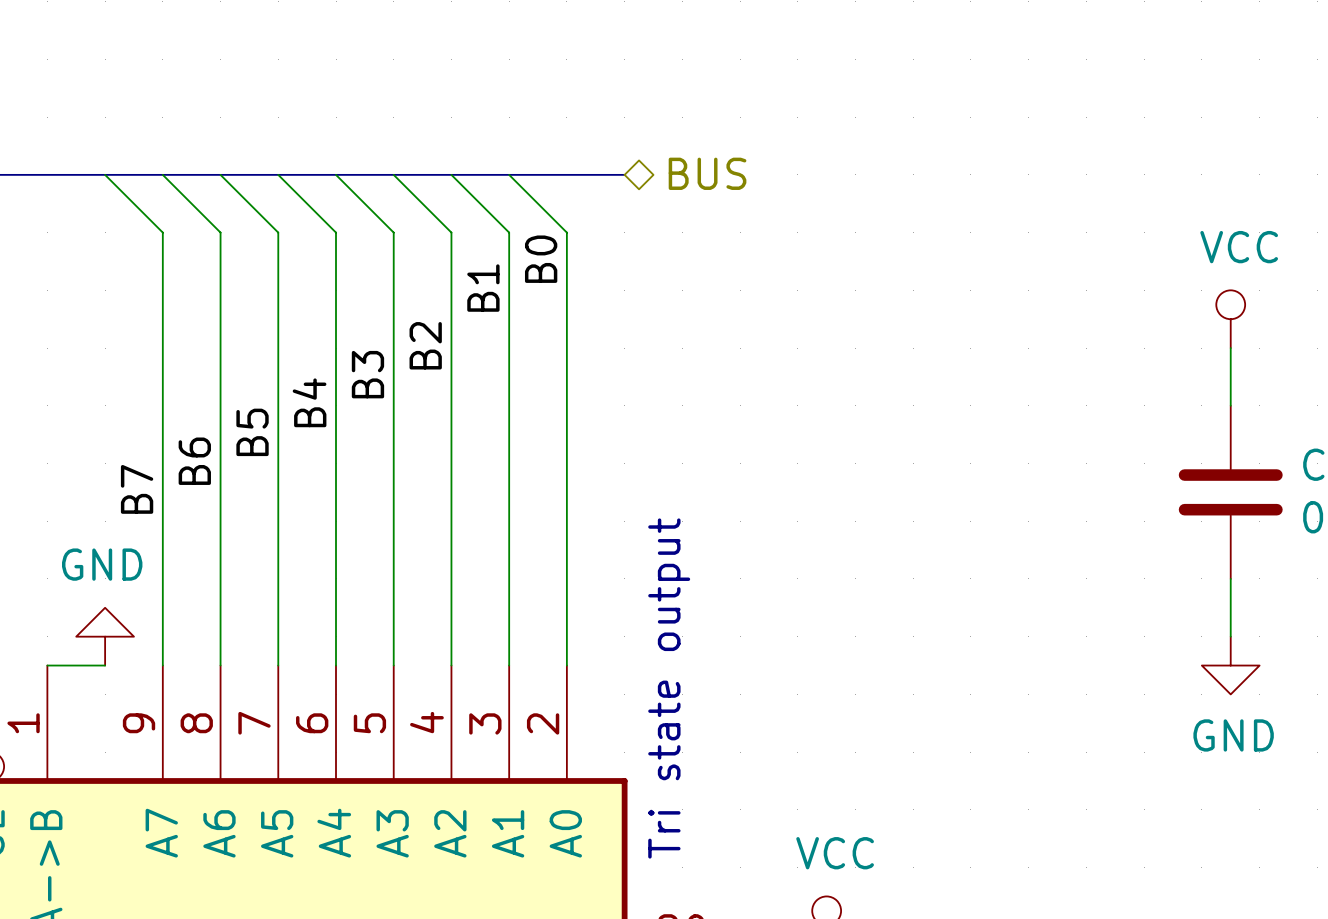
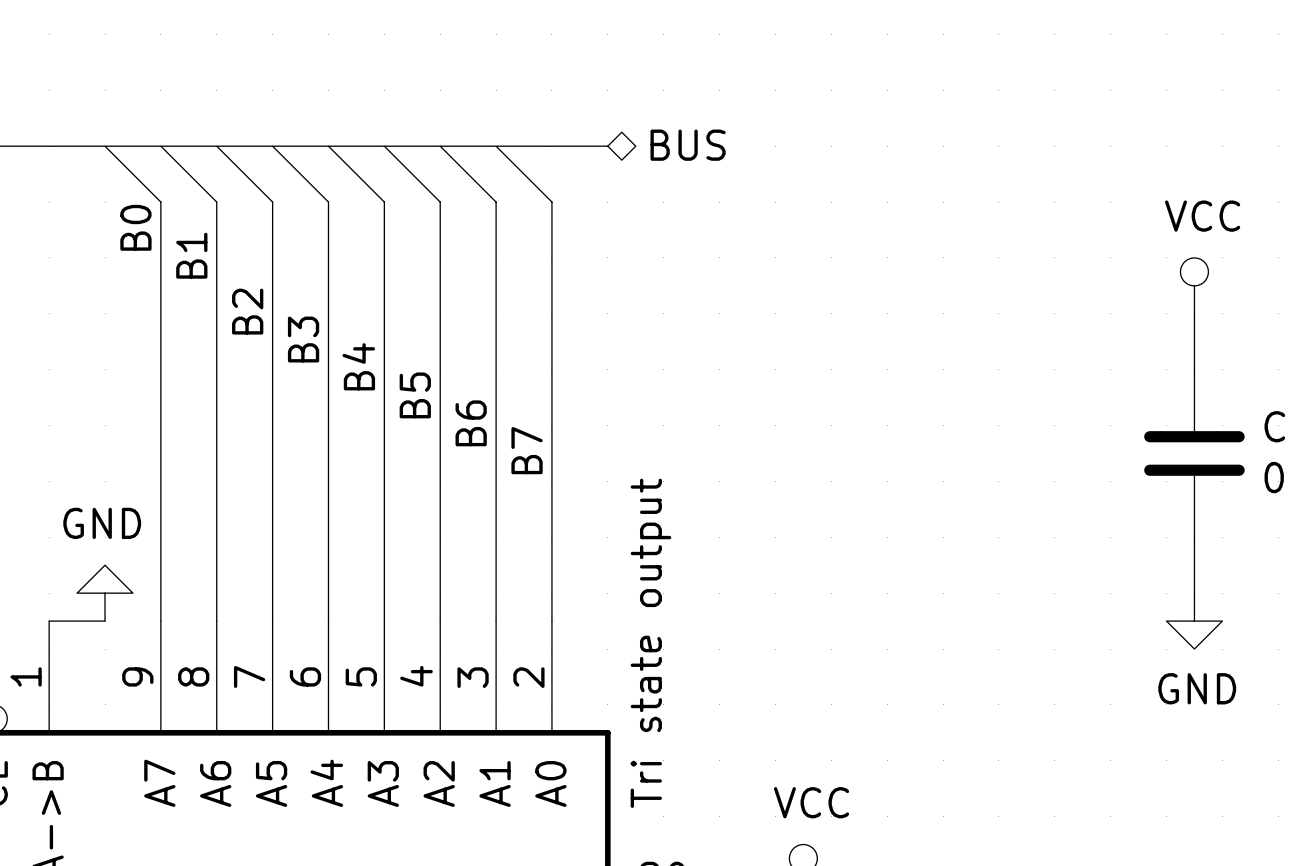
label position: B0 (541, 259) -> B0 (135, 227)
label position: B1 (483, 288) -> B1 (191, 255)
label position: B2 (425, 345) -> B2 (247, 311)
label position: B3 (367, 374) -> B3 (303, 339)
label position: B4 (309, 402) -> B4 (358, 366)
label position: B5 (252, 432) -> B5 (415, 395)
label position: B6 (194, 461) -> B6 (471, 423)
label position: B7 (137, 489) -> B7 (527, 450)

